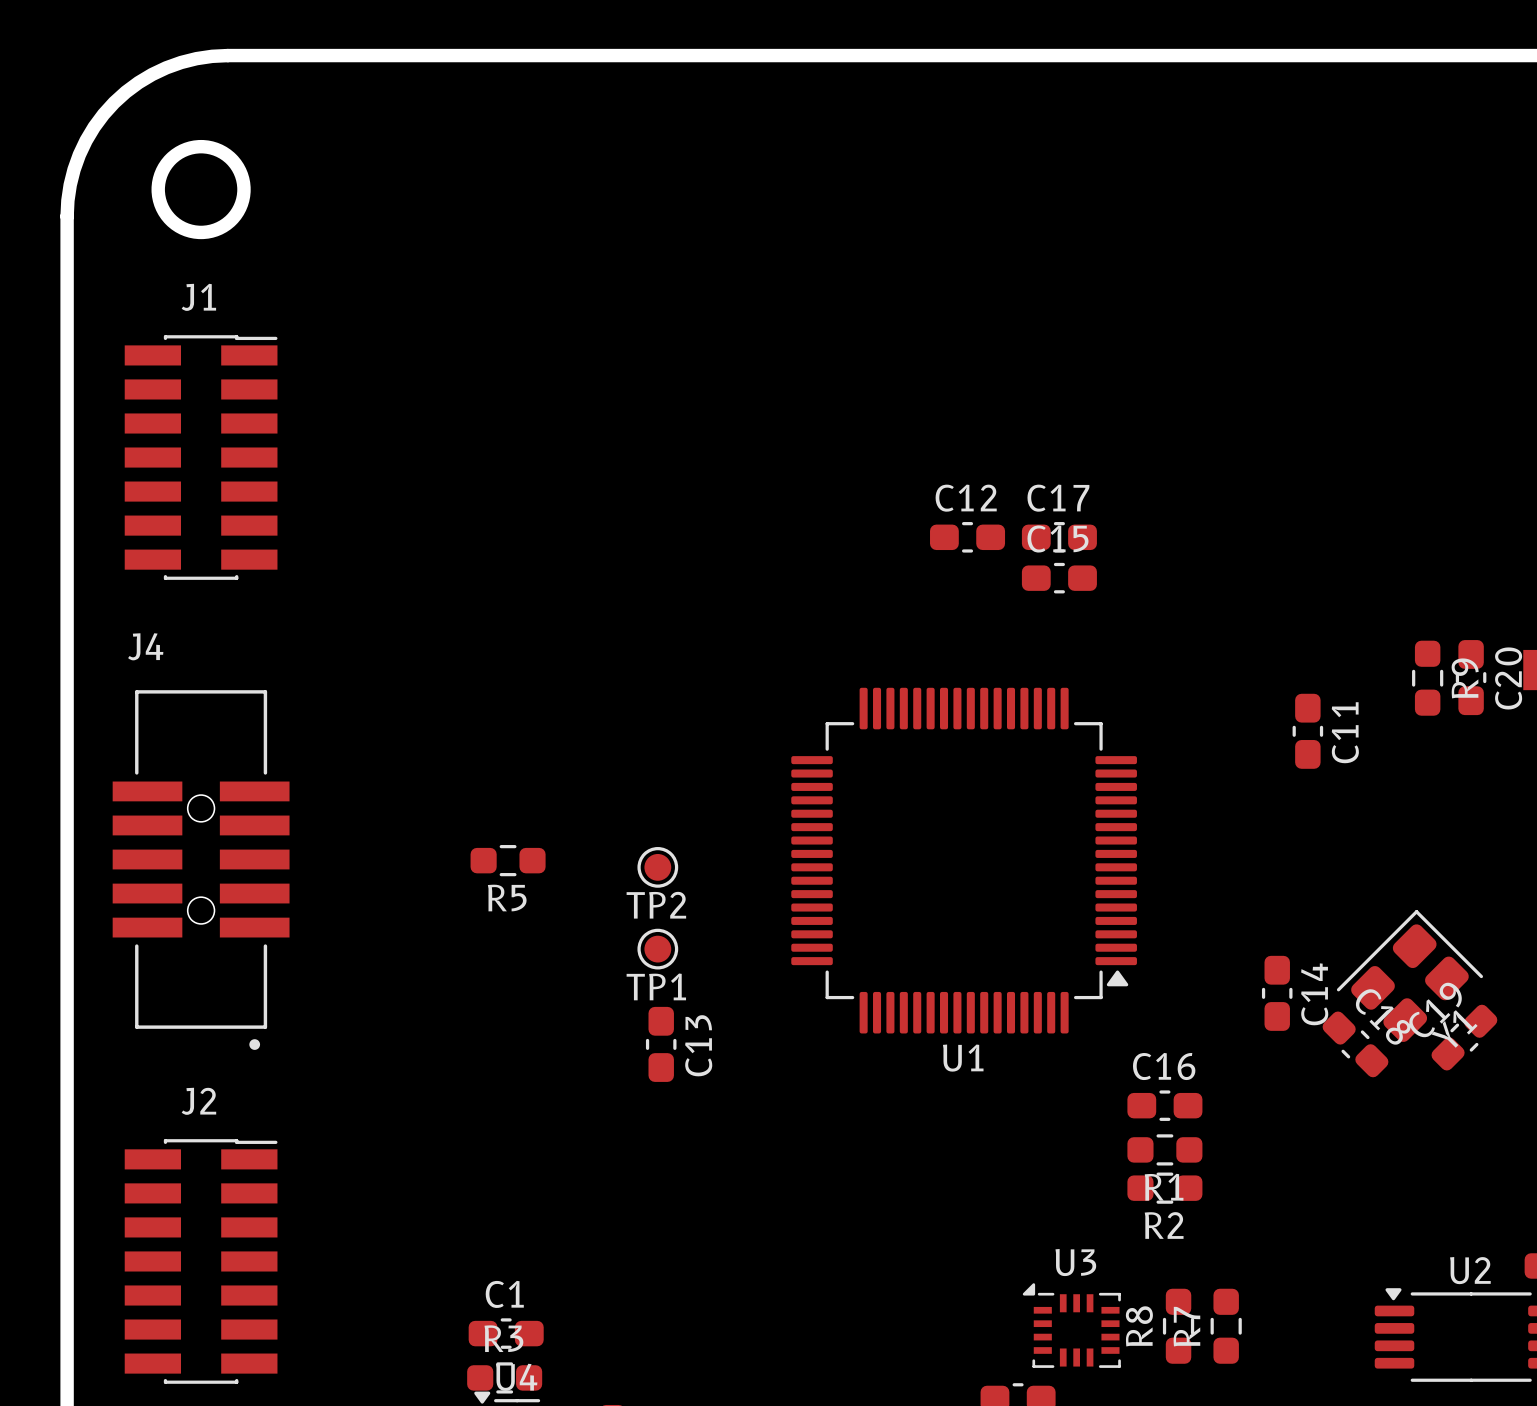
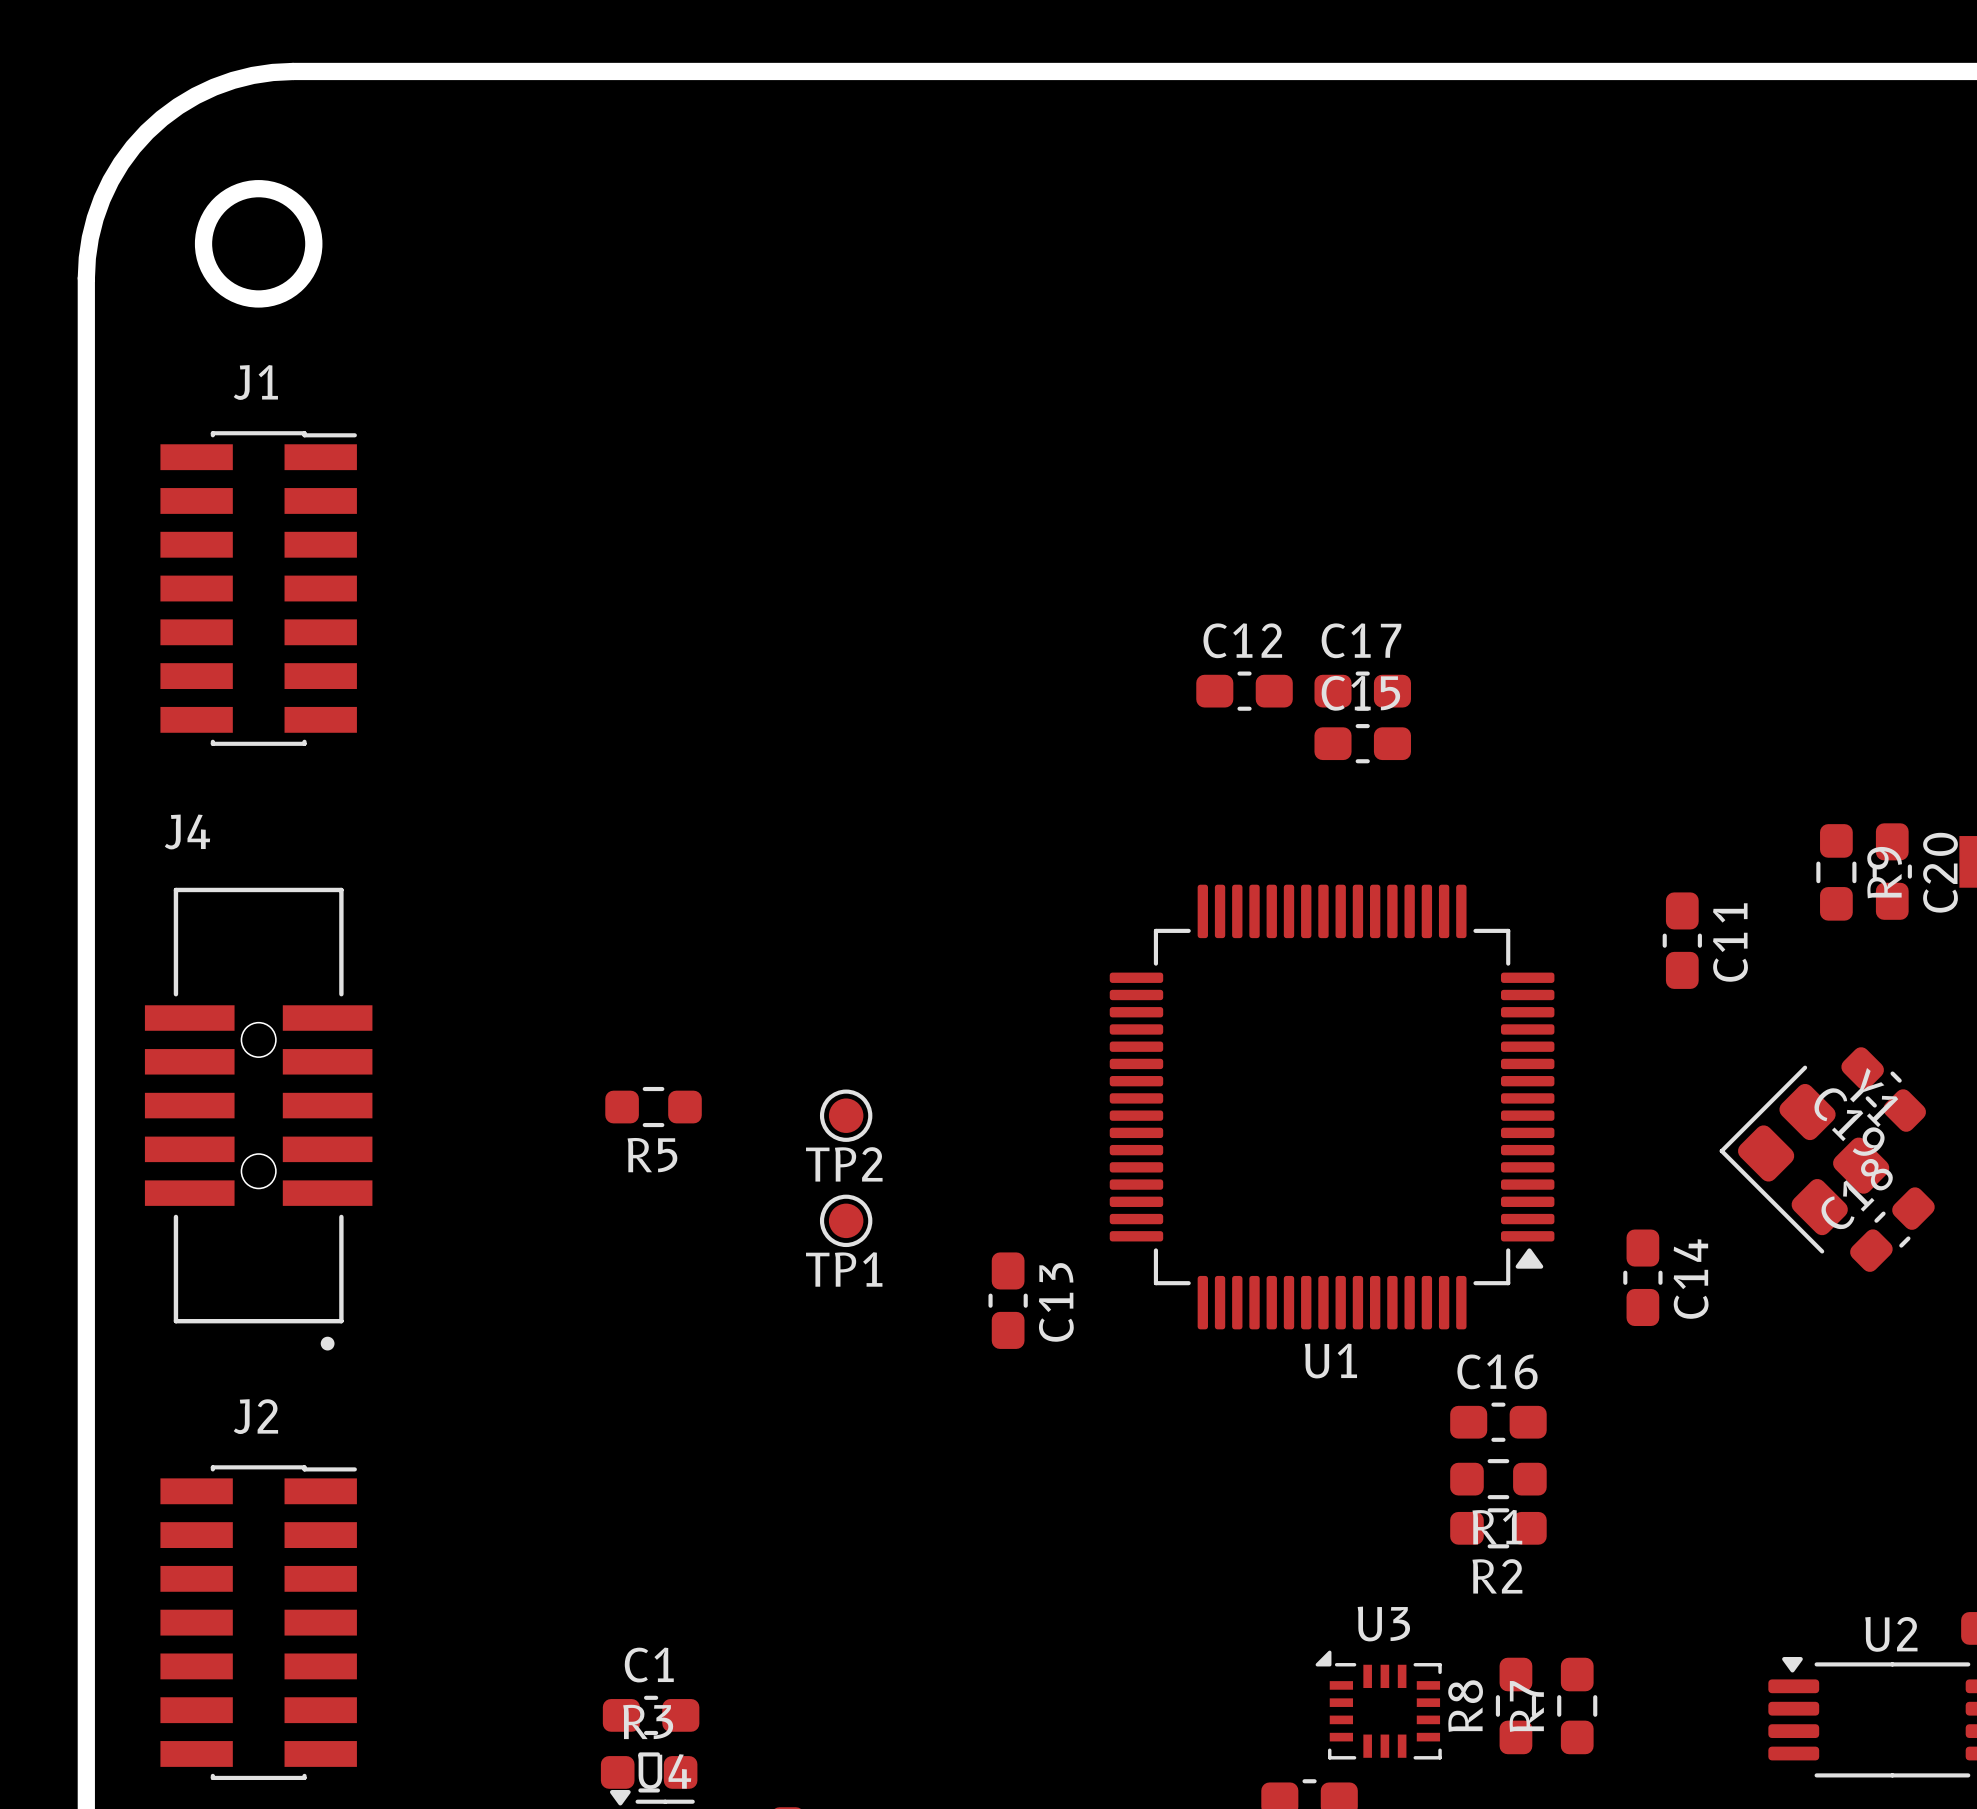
U1 position: (964, 860) -> (1332, 1107)
Y1 rotation: 0° (1409, 976) -> 90° counterclockwise (1804, 1159)
C19 name position: C19 (1435, 1010) -> C19 (1849, 1121)
C18 name position: C18 (1383, 1016) -> C18 (1857, 1194)
C19 rotation: 0° (1464, 1037) -> 90° clockwise (1883, 1089)
C19 position: (1464, 1037) -> (1883, 1089)
C13 position: (661, 1044) -> (1008, 1300)
C18 rotation: 0° (1355, 1044) -> 90° clockwise (1892, 1229)
C18 position: (1355, 1044) -> (1892, 1229)

